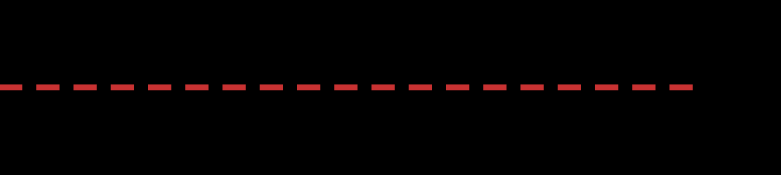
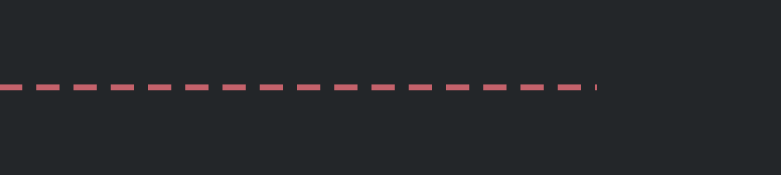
line: (596, 87) (693, 87) -> none

